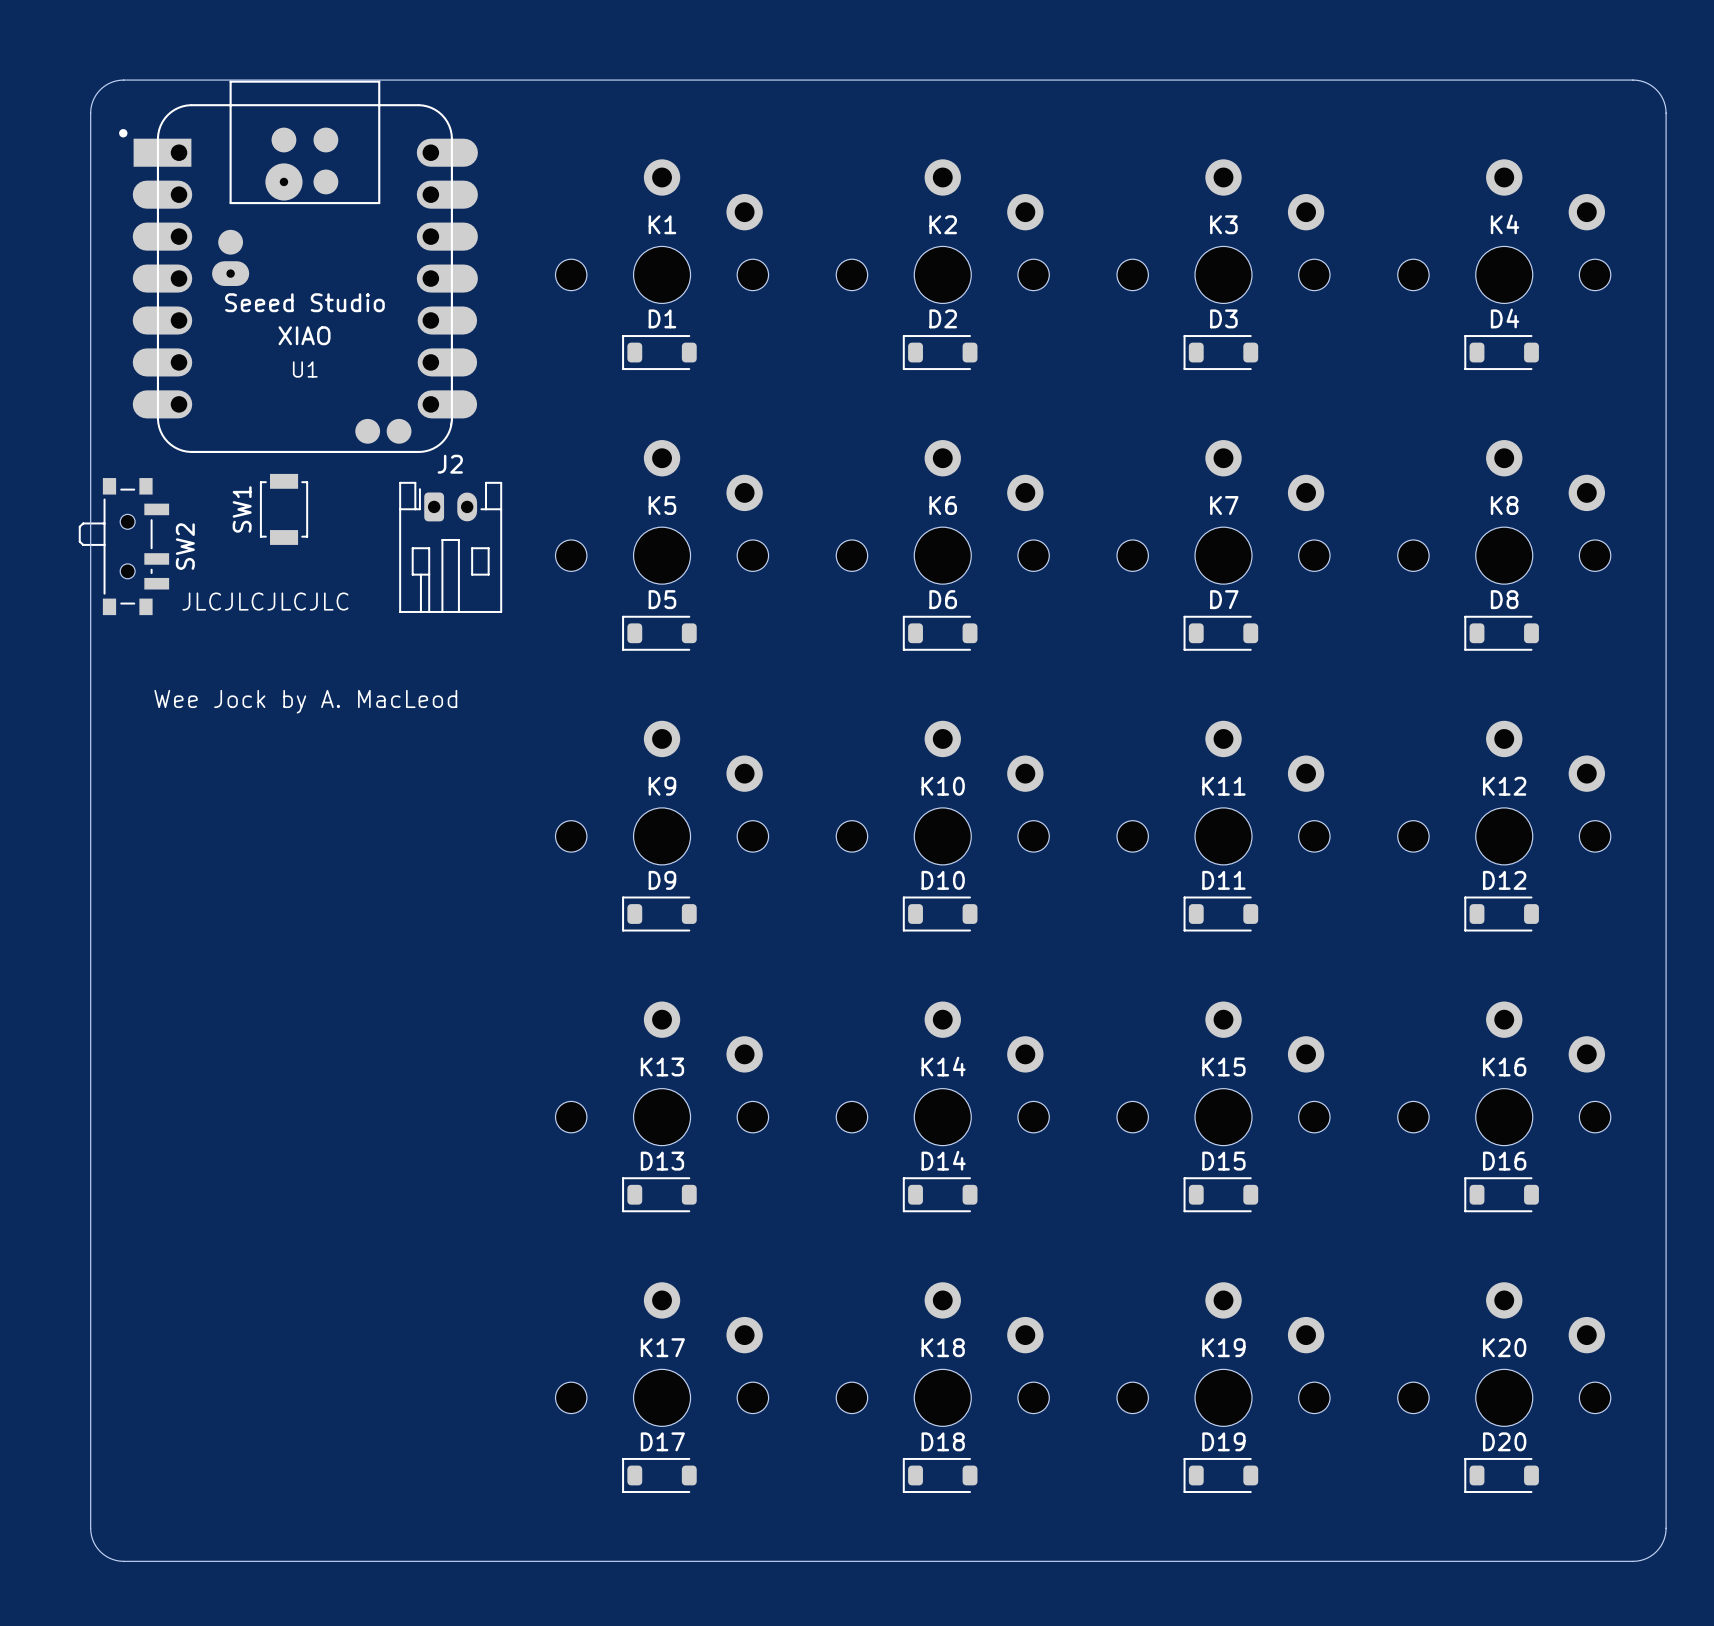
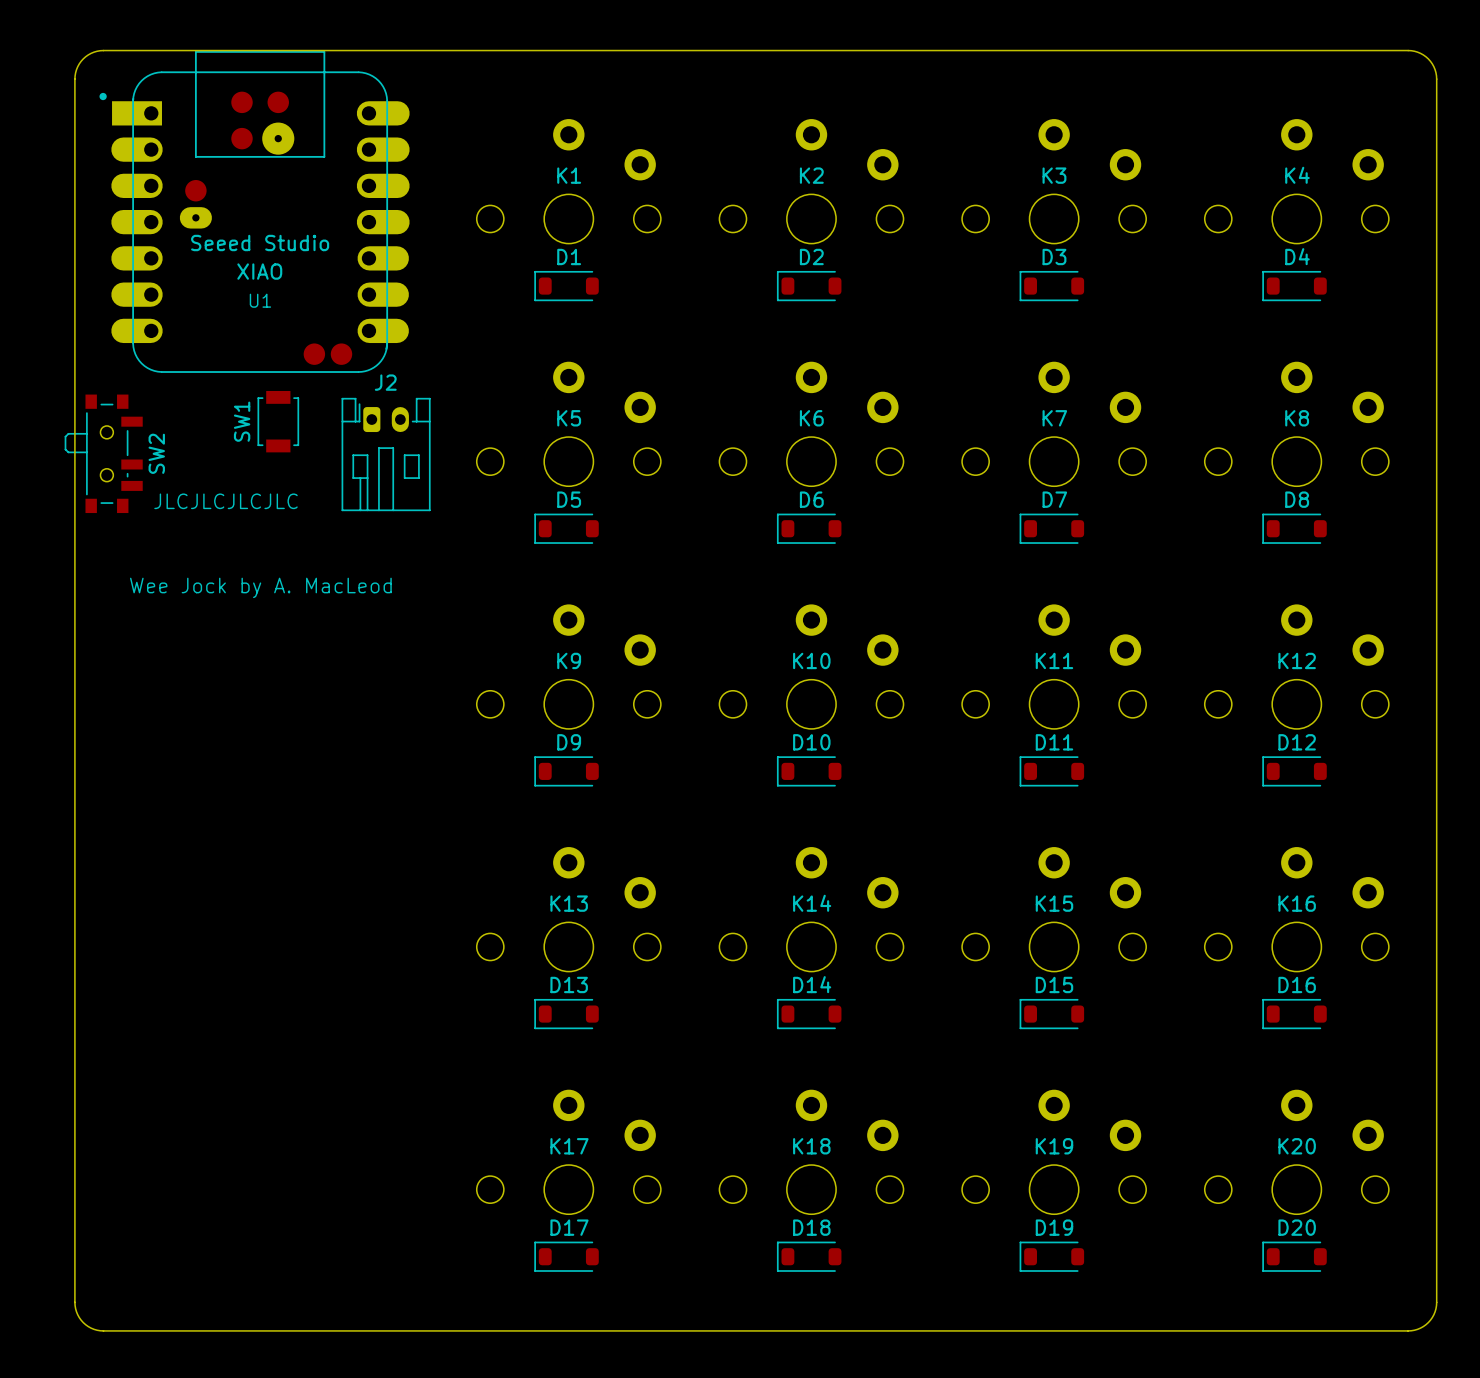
U1 footprint: [119, 80, 478, 454] -> [99, 51, 410, 373]
SW1 position: (284, 509) -> (278, 421)

